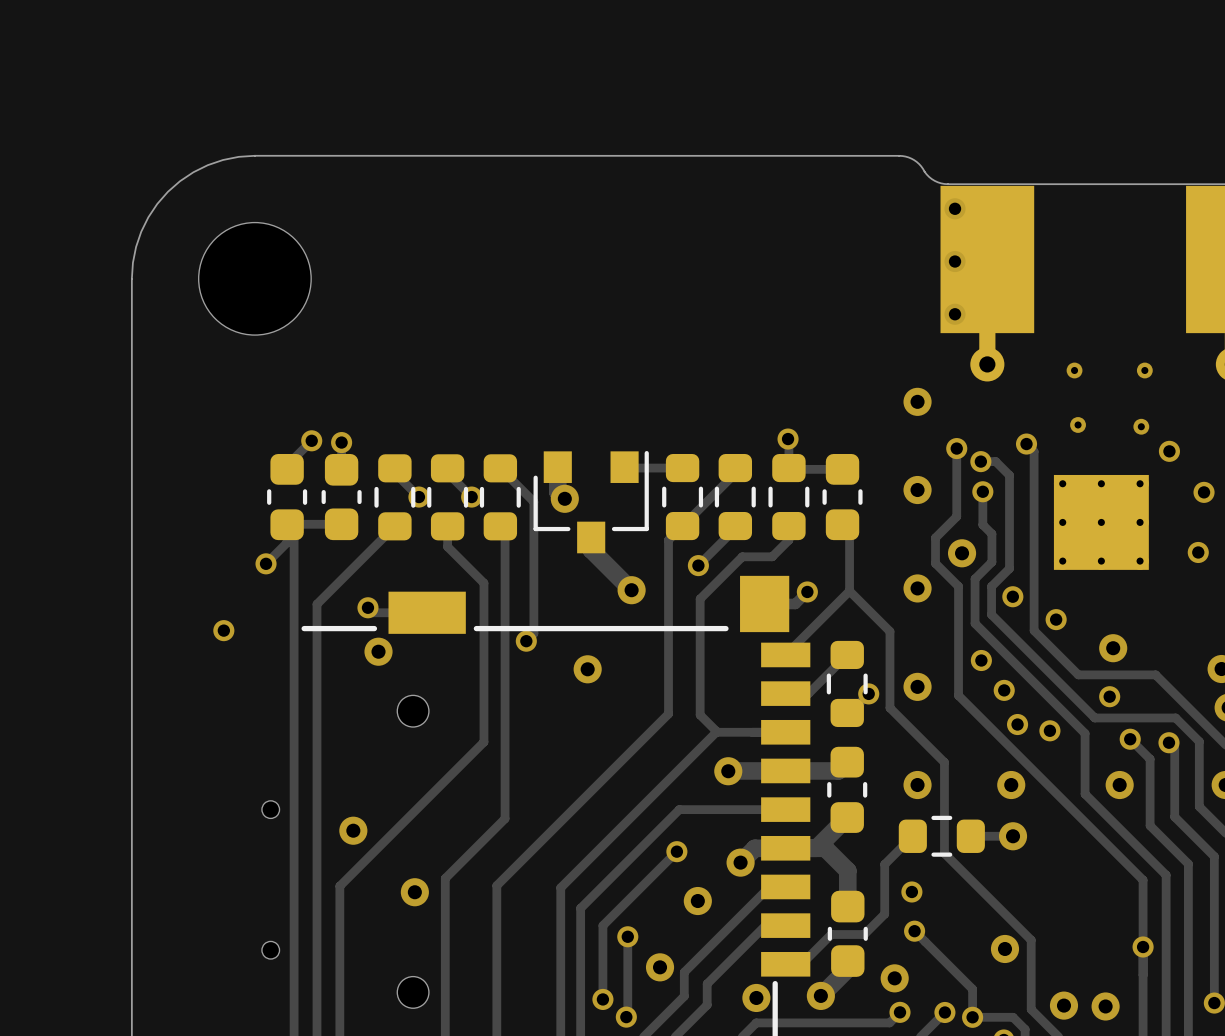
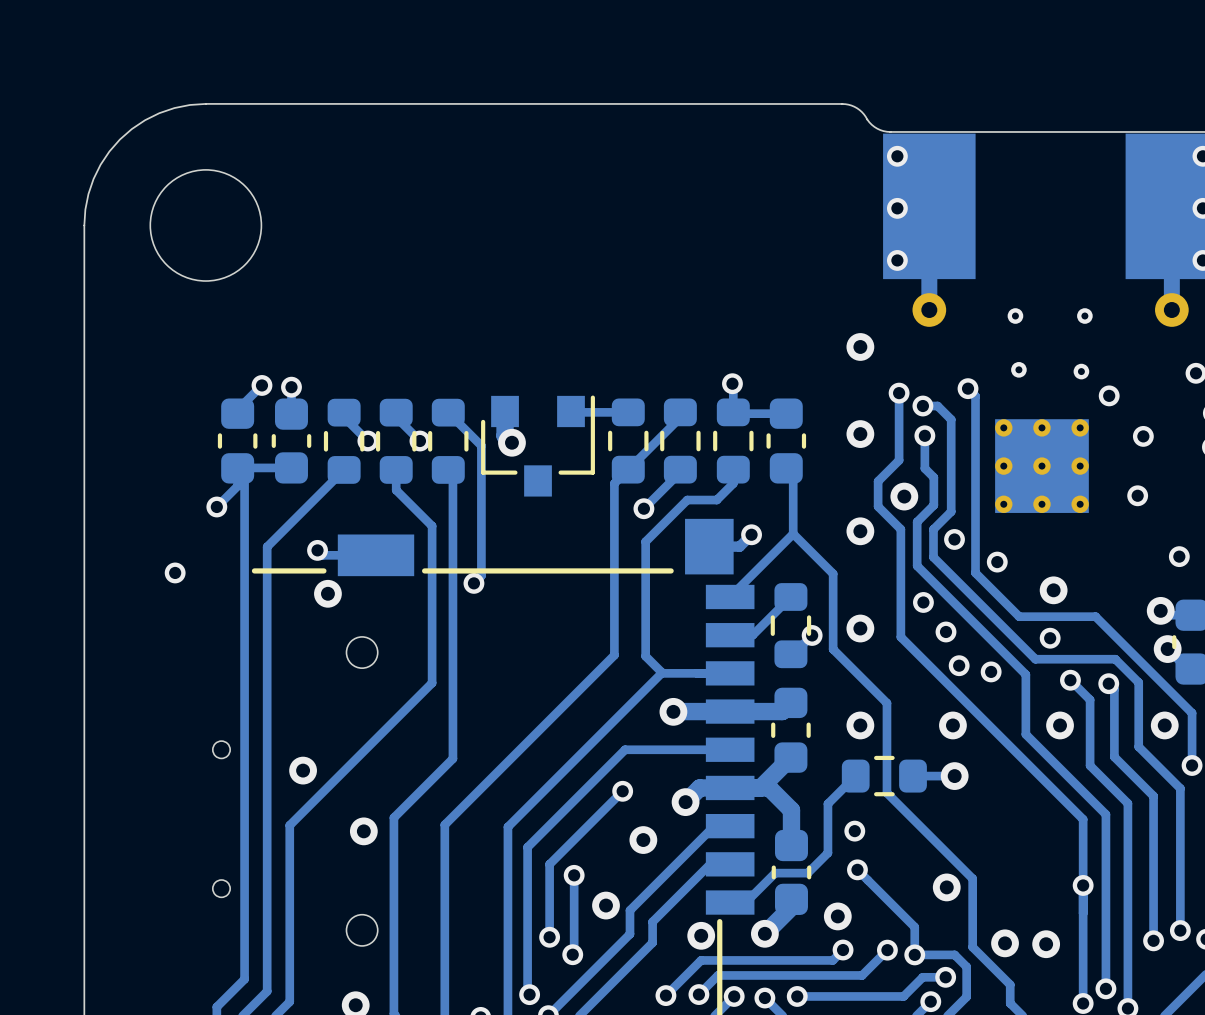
track: (591, 537) (591, 549) (631, 590) -> none
via: (631, 590) -> none
via: (587, 669) -> none

